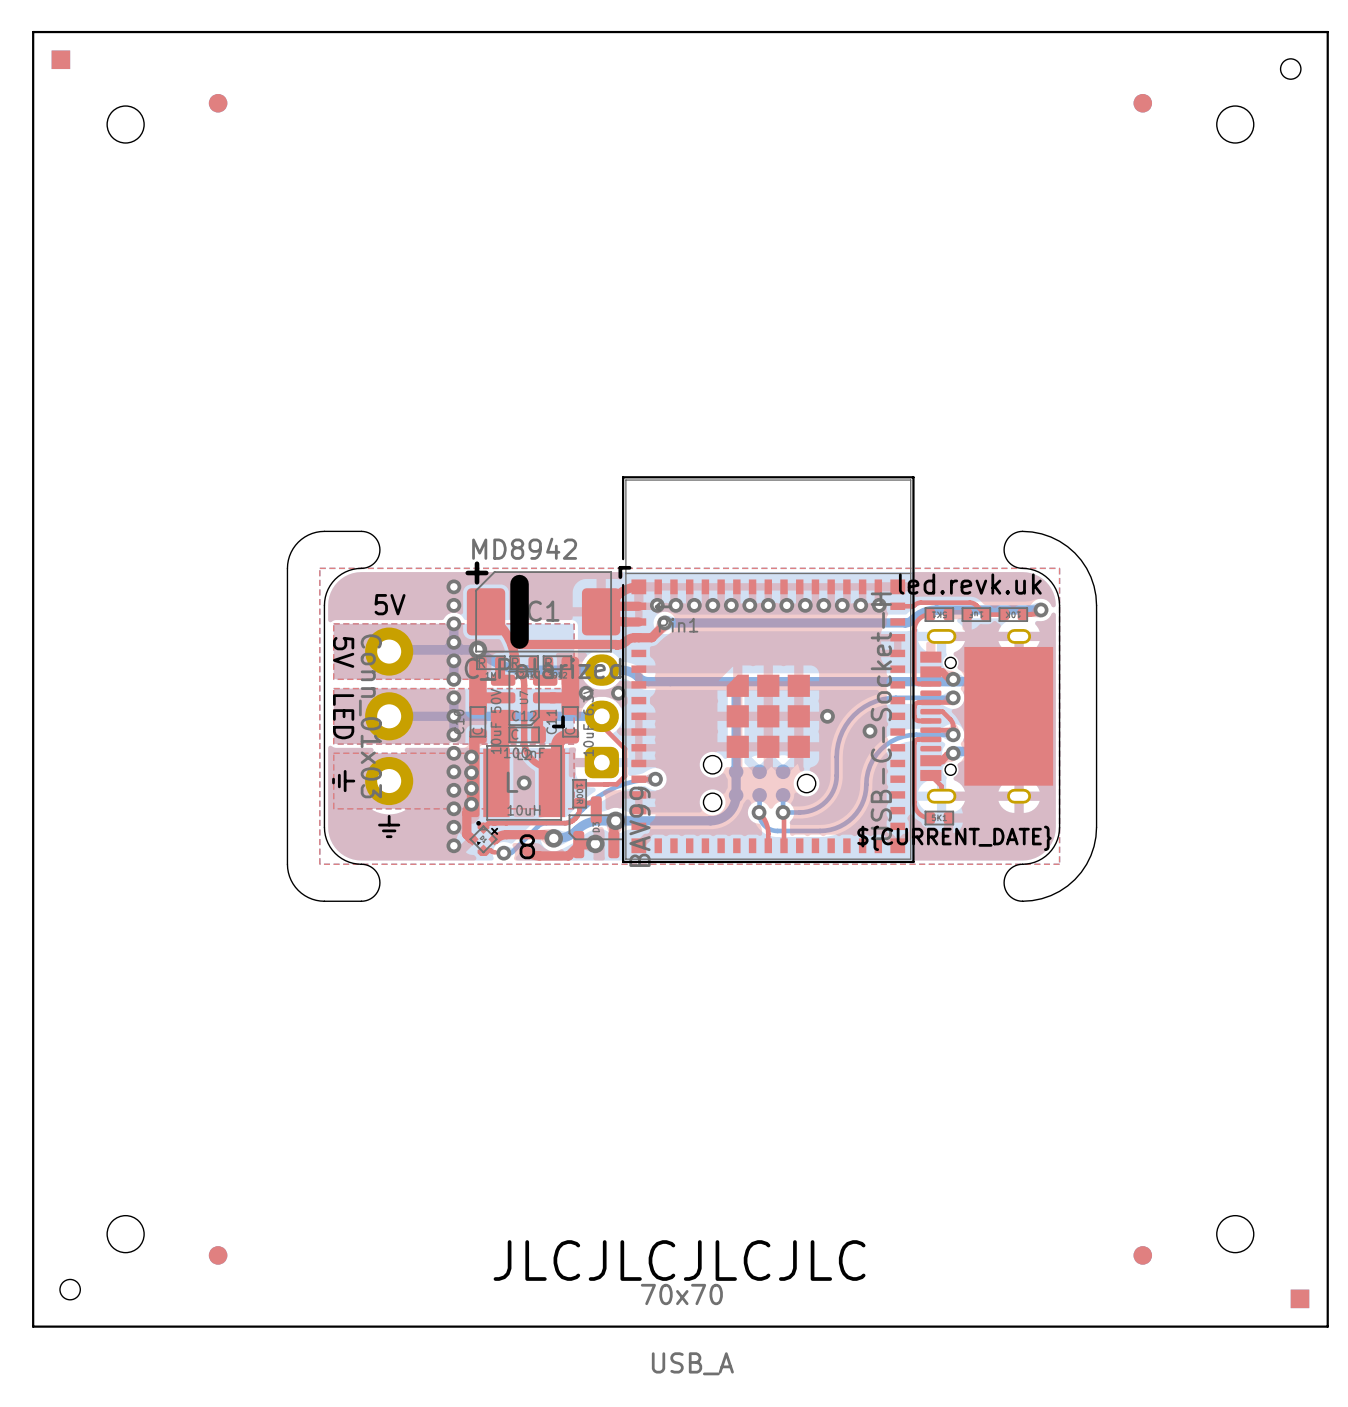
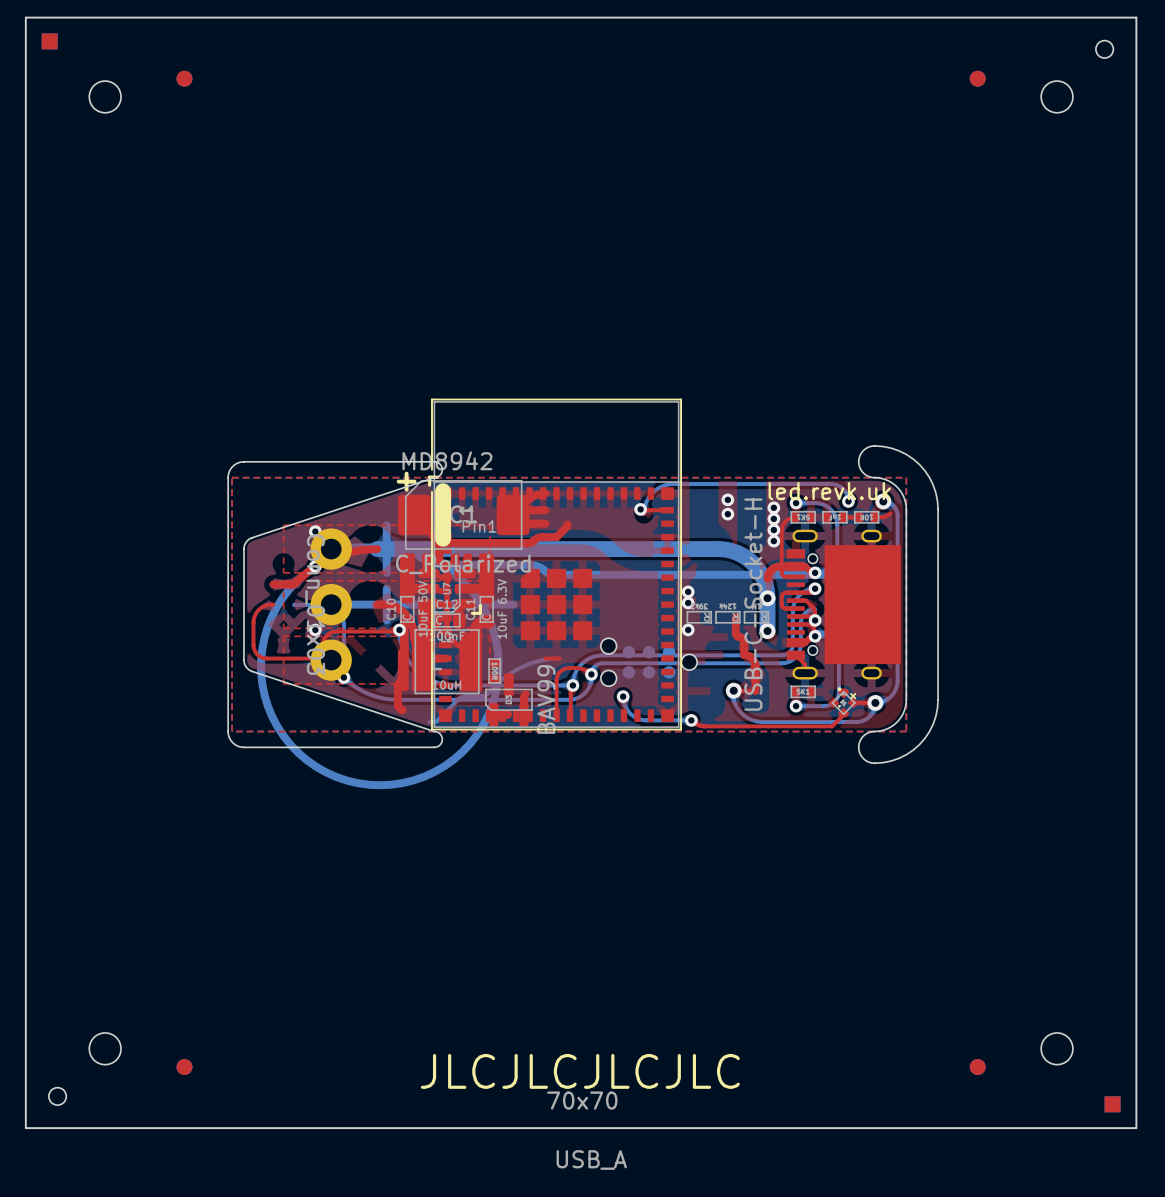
top zone outline: (319, 568) (319, 864) -> (271, 477) (232, 477) (232, 731) (271, 731)
via: (453, 586) -> none
via: none -> (727, 499)
bottom track: none -> (848, 501) (843, 489) (833, 484) (670, 484) (657, 488) (650, 495) (645, 504) (643, 514)
bottom track: none -> (883, 501) (893, 505) (897, 515) (897, 680) (893, 694) (883, 701) (875, 702) (871, 714) (861, 721) (762, 721) (752, 720) (741, 713) (734, 701) (733, 690)
via: none -> (883, 501)
bottom track: none -> (796, 503) (823, 504) (832, 511) (836, 519) (835, 559) (826, 569) (815, 572)
via: none -> (796, 503)
via: none -> (773, 507)
text: 5V (390, 604) -> none
via: (453, 605) -> none
via: (657, 605) -> none
via: (675, 605) -> none
via: (694, 605) -> none
via: (712, 605) -> none
via: (731, 605) -> none
via: (768, 605) -> none
via: (786, 605) -> none
via: (805, 605) -> none
via: (823, 605) -> none
via: (842, 605) -> none
via: (860, 605) -> none
via: (879, 605) -> none
top track: none -> (667, 510) (647, 510) (643, 514)
top track: (897, 606) (912, 606) (920, 602) (970, 602) (985, 614) -> none
bottom track: (1041, 609) (932, 610) (923, 612) (905, 622) (664, 622) -> none
via position: (1041, 609) -> (848, 501)
via: none -> (727, 514)
via: none -> (773, 518)
via: (664, 622) -> none
via: (453, 623) -> none
via: none -> (773, 530)
via: none -> (315, 531)
via: (453, 642) -> none
via: none -> (773, 541)
via: (477, 649) -> none
board edge: (287, 651) (287, 564) (295, 545) (304, 537) (320, 531) (363, 531) (372, 535) (379, 547) (376, 561) (368, 566) (349, 570) (338, 576) (328, 589) (324, 605) (324, 831) (330, 846) (338, 856) (349, 862) (368, 865) (376, 871) (379, 885) (372, 897) (363, 901) (320, 901) (304, 895) (295, 887) (287, 868) (287, 781) -> (243, 549) (246, 542) (252, 537) (437, 477) (441, 472) (441, 466) (434, 461) (243, 461) (232, 466) (228, 477) (228, 731) (231, 741) (237, 745) (243, 747) (434, 747) (439, 745) (442, 738) (437, 732) (252, 671) (246, 667) (243, 660)
top track: none -> (377, 549) (350, 552) (332, 557) (308, 571) (293, 584) (273, 584)
text: 5V (343, 652) -> none
drawing: [476, 655, 573, 671] -> none
via: (453, 660) -> none
part position: (766, 669) -> (555, 564)
via: none -> (315, 566)
top track: none -> (795, 566) (774, 567) (769, 572) (767, 578)
via: (453, 679) -> none
bottom track: (736, 681) (735, 798) (732, 808) (726, 815) (710, 820) (596, 820) (584, 824) (567, 836) (553, 838) -> none
bottom track: none -> (273, 584) (293, 584) (297, 580) (282, 598) (271, 617) (262, 650) (262, 683) (272, 716) (290, 744) (316, 766) (347, 780) (369, 784) (391, 784) (424, 776) (444, 766) (470, 743) (483, 725) (492, 704) (498, 671) (497, 648) (492, 627) (482, 606) (469, 588) (443, 566) (423, 555) (413, 552) (402, 549) (390, 547) (357, 549) (346, 552) (335, 556) (325, 560) (315, 566) (343, 553) (374, 549) (377, 549) (718, 549) (724, 549) (737, 552) (748, 559) (760, 573) (767, 591) (767, 631)
via: (586, 693) -> none
via: (618, 693) -> none
via: (453, 697) -> none
bottom track: (953, 697) (889, 698) (864, 706) (849, 720) (840, 737) (837, 750) (835, 783) (825, 801) (807, 811) (783, 812) (783, 795) -> (815, 588) (801, 593) (794, 602) (792, 646) (785, 654) (599, 655) (586, 659) (579, 666) (574, 675) (572, 685) (454, 685) (436, 682) (425, 676) (411, 664) (402, 648) (399, 629)
via: none -> (688, 591)
via: none -> (767, 598)
via: none -> (688, 603)
top track: none -> (273, 604) (262, 607) (254, 616) (253, 646) (257, 654) (265, 658) (329, 659) (339, 665) (343, 677)
text: LED (343, 716) -> none
bottom track: none -> (294, 604) (326, 605) (338, 610) (343, 622) (343, 677) (368, 694) (397, 699) (572, 699) (580, 696) (586, 691) (590, 683) (592, 669) (601, 663) (786, 662) (793, 659) (799, 651) (802, 616) (807, 611) (815, 609)
top track: none -> (377, 604) (390, 605) (402, 611) (410, 621) (414, 640) (420, 651) (431, 657) (445, 658)
via: (453, 716) -> none
part: (601, 716) -> none
via: (827, 716) -> none
drawing: none -> [686, 610, 770, 624]
top track: (604, 728) (624, 748) (624, 776) (616, 784) (579, 784) -> none
top track: none -> (735, 617) (735, 634) (743, 639) (744, 654) (751, 657) (755, 663) (755, 691) (733, 690)
via: (870, 731) -> none
via: (453, 734) -> none
bottom track: (953, 734) (909, 735) (897, 738) (885, 745) (876, 754) (870, 765) (865, 795) (859, 809) (848, 820) (835, 828) (820, 830) (777, 830) (769, 829) (760, 818) (759, 795) -> none
top track: (930, 739) (917, 739) (914, 743) (914, 806) (920, 814) (930, 818) -> (795, 624) (810, 624) (814, 631)
via: none -> (315, 629)
top track: none -> (399, 629) (397, 631) (334, 631) (325, 636) (323, 644)
via: none -> (399, 629)
via: none -> (688, 629)
via: none -> (767, 631)
bottom track: none -> (815, 631) (829, 636) (837, 646) (838, 655) (838, 695) (834, 701) (828, 705) (796, 706)
via: (453, 753) -> none
via: (471, 757) -> none
via: (453, 771) -> none
via: (471, 772) -> none
via: (655, 779) -> none
text: ⏚ (343, 781) -> none
via: (524, 782) -> none
via: (471, 788) -> none
via: (453, 790) -> none
top track: none -> (591, 674) (584, 669) (576, 668) (565, 668) (559, 673) (556, 680) (556, 715)
via: none -> (591, 674)
via: none -> (343, 677)
via: (471, 804) -> none
via: (453, 808) -> none
top track: (596, 809) (592, 803) (579, 802) (577, 816) (569, 822) (488, 823) (483, 828) -> none
top track: none -> (572, 685) (570, 687) (570, 715)
via: none -> (572, 685)
top track: (759, 812) (767, 826) (768, 845) -> none
via: (759, 812) -> none
top track: (783, 812) (784, 845) -> none
via: (783, 812) -> none
via: none -> (733, 690)
via: (615, 820) -> none
bottom track: none -> (623, 696) (626, 708) (637, 718) (646, 720) (691, 720)
via: none -> (623, 696)
text: ⏚ (389, 826) -> none
via: (453, 827) -> none
top track: none -> (853, 702) (875, 702)
via: none -> (875, 702)
via: none -> (796, 706)
part position: (483, 838) -> (843, 702)
top track: (553, 838) (544, 834) (506, 834) (494, 839) -> none
via: (553, 838) -> none
text: ${CURRENT_DATE} (954, 838) -> none
via: (595, 843) -> none
top track: none -> (843, 714) (832, 726) (703, 726) (691, 720)
via: (453, 845) -> none
text: 8 (527, 846) -> none
top track: (577, 846) (568, 855) (537, 855) (526, 850) -> none
top track: (483, 850) (495, 852) -> none
via: none -> (691, 720)
via: (503, 853) -> none

